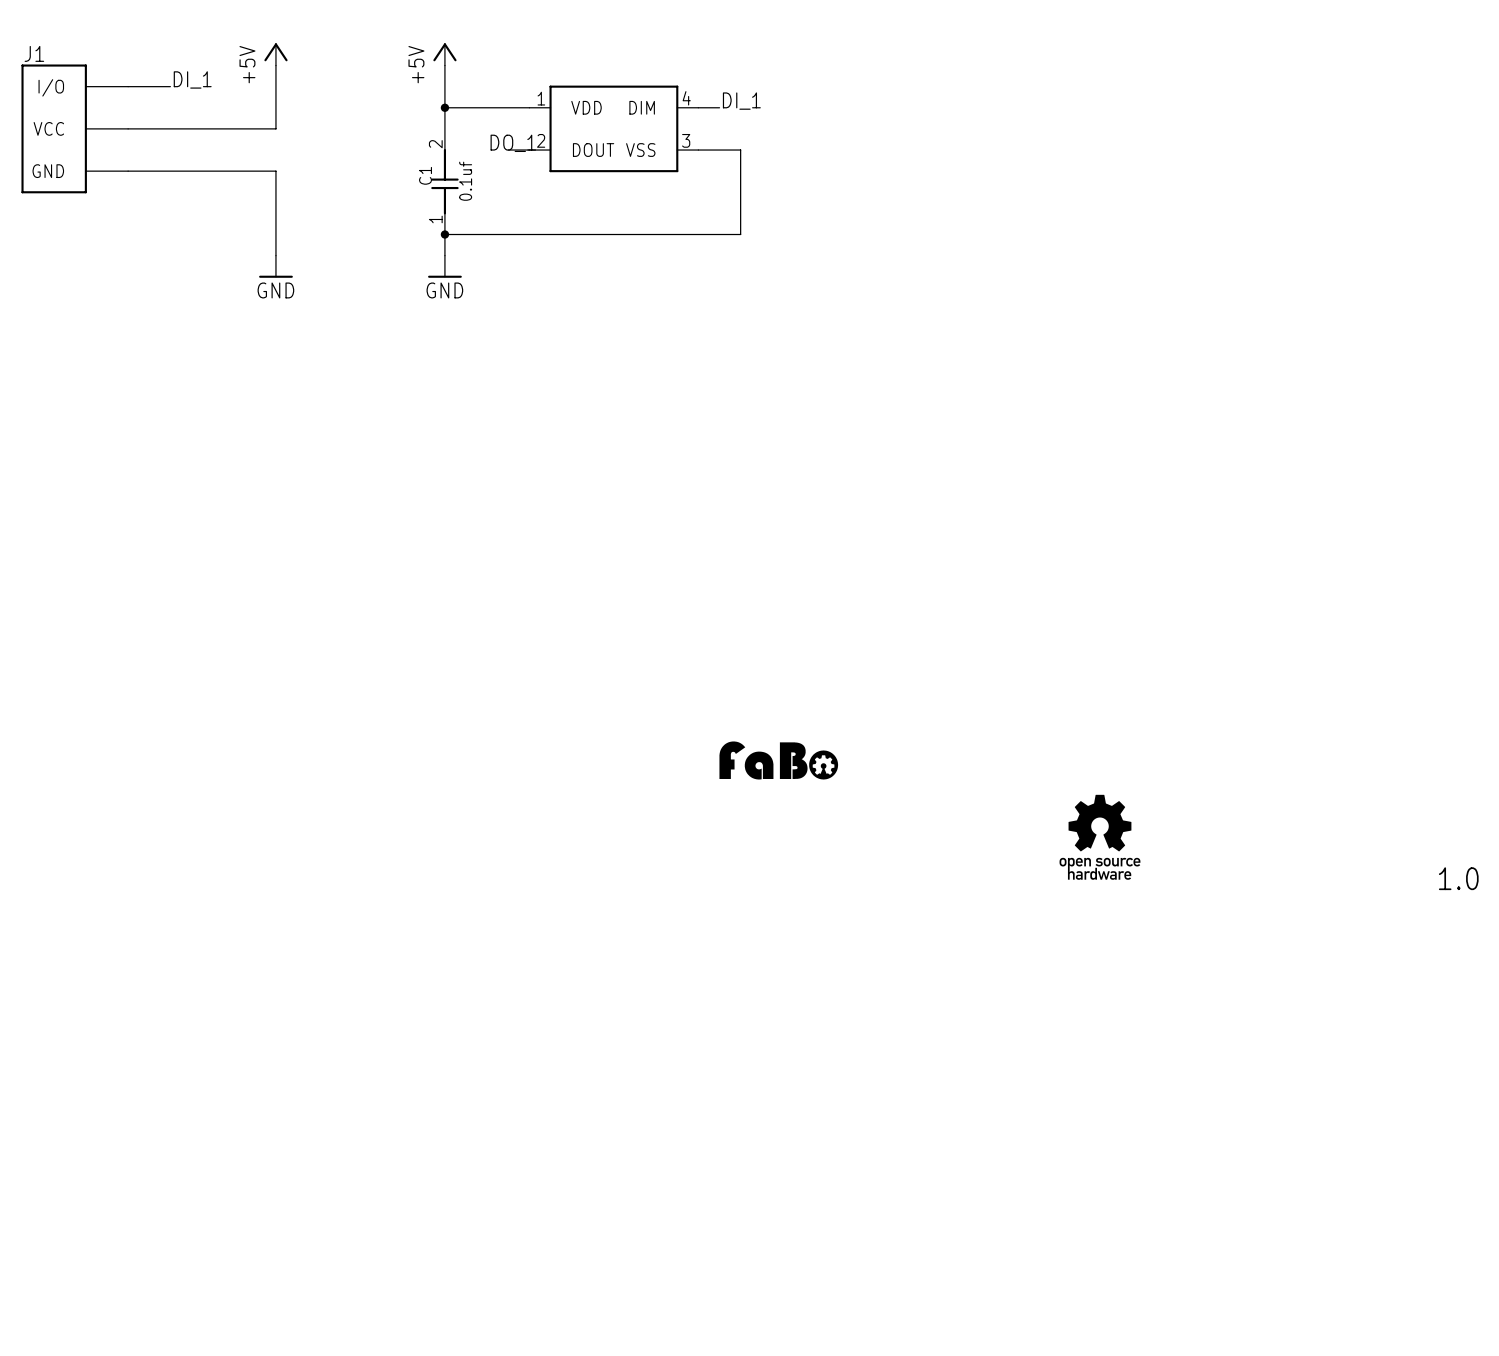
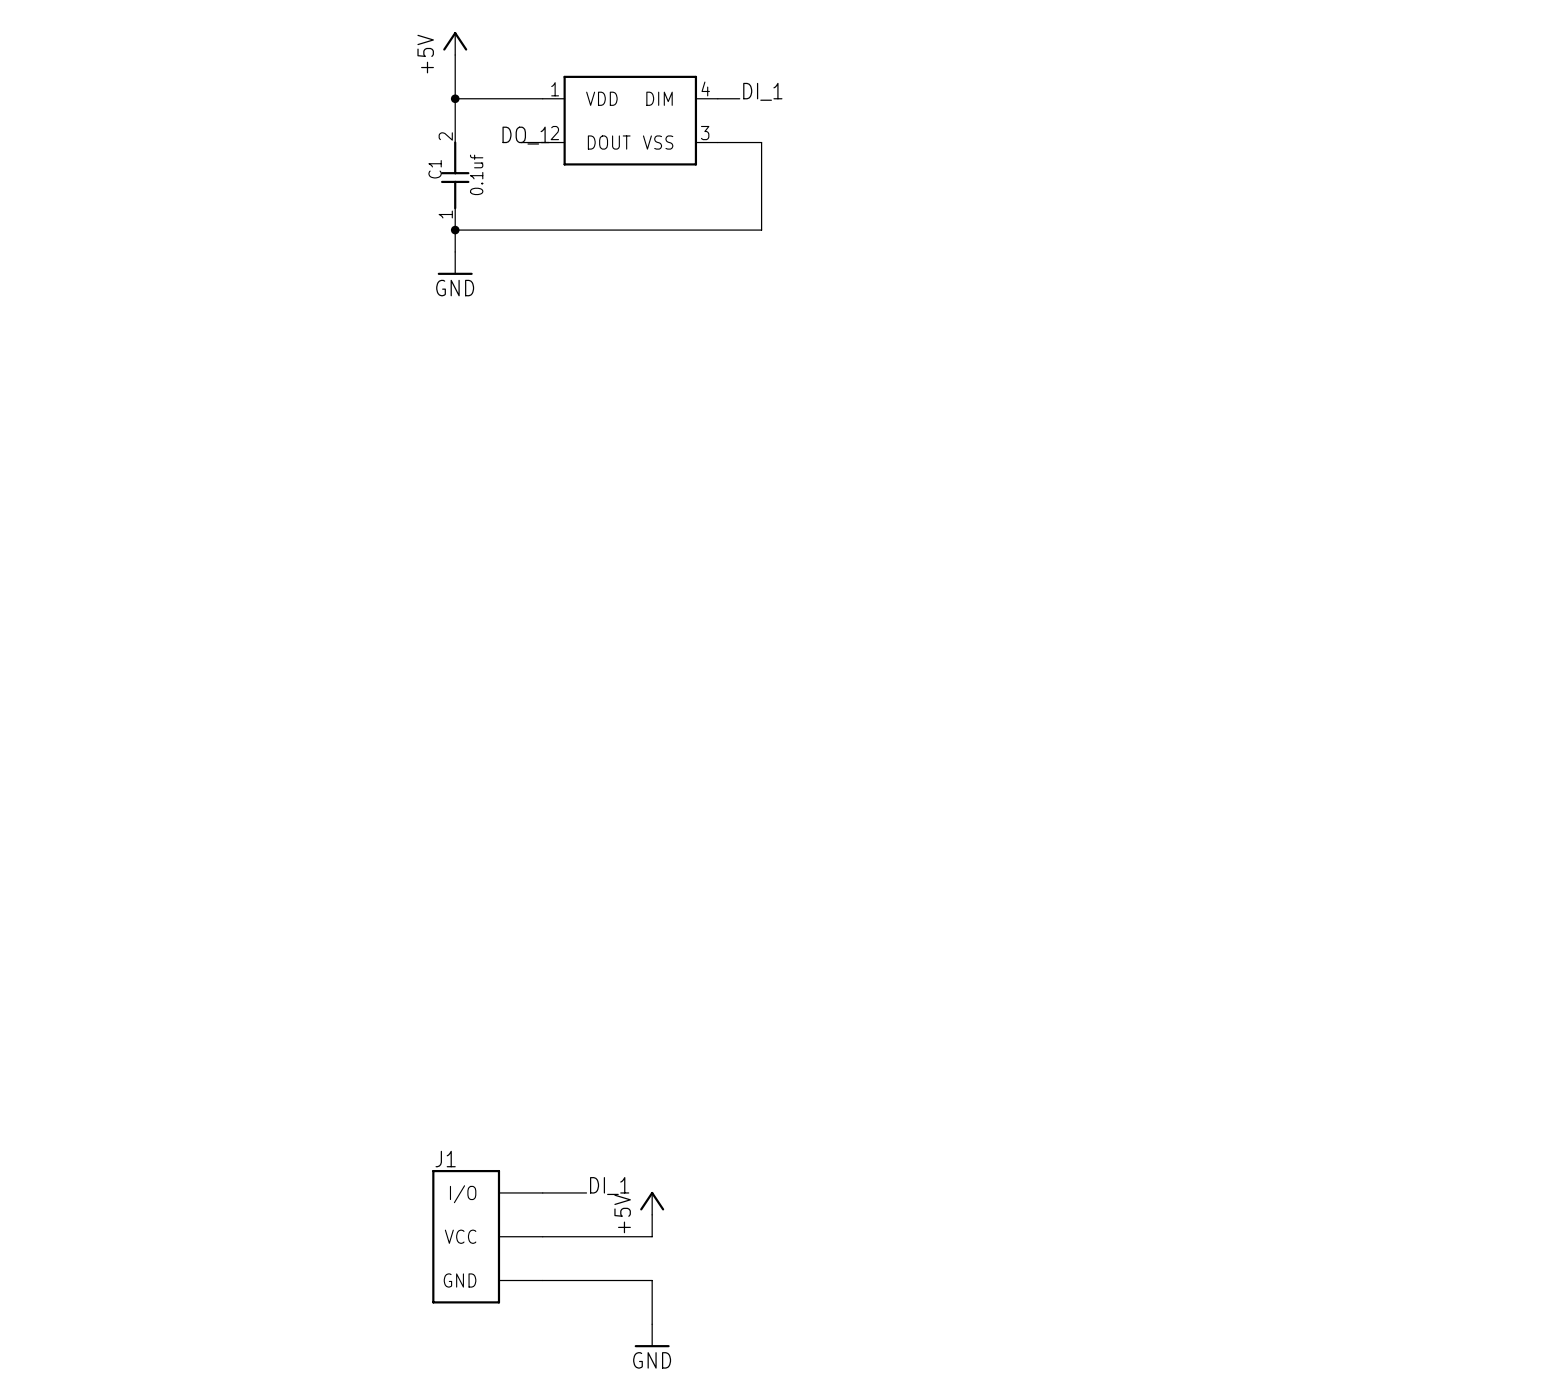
power symbol: +5V (275, 54) -> none
wire: (275, 65) (275, 128) (128, 128) -> none
label: DI_1 (192, 79) -> none
wire: (128, 86) (170, 86) -> none
J1 position: (74, 128) -> (487, 1236)
wire: (128, 171) (275, 171) (275, 255) -> none
power symbol: GND (275, 266) -> none
part: (778, 760) -> none
part: (1099, 837) -> none
text: 1.0 (1458, 878) -> none
label: none -> DI_1 (609, 1186)
wire: none -> (542, 1192) (586, 1192)
power symbol: none -> +5V (652, 1203)
wire: none -> (652, 1214) (652, 1236) (542, 1236)
wire: none -> (542, 1280) (652, 1280) (652, 1324)
power symbol: none -> GND (652, 1335)

